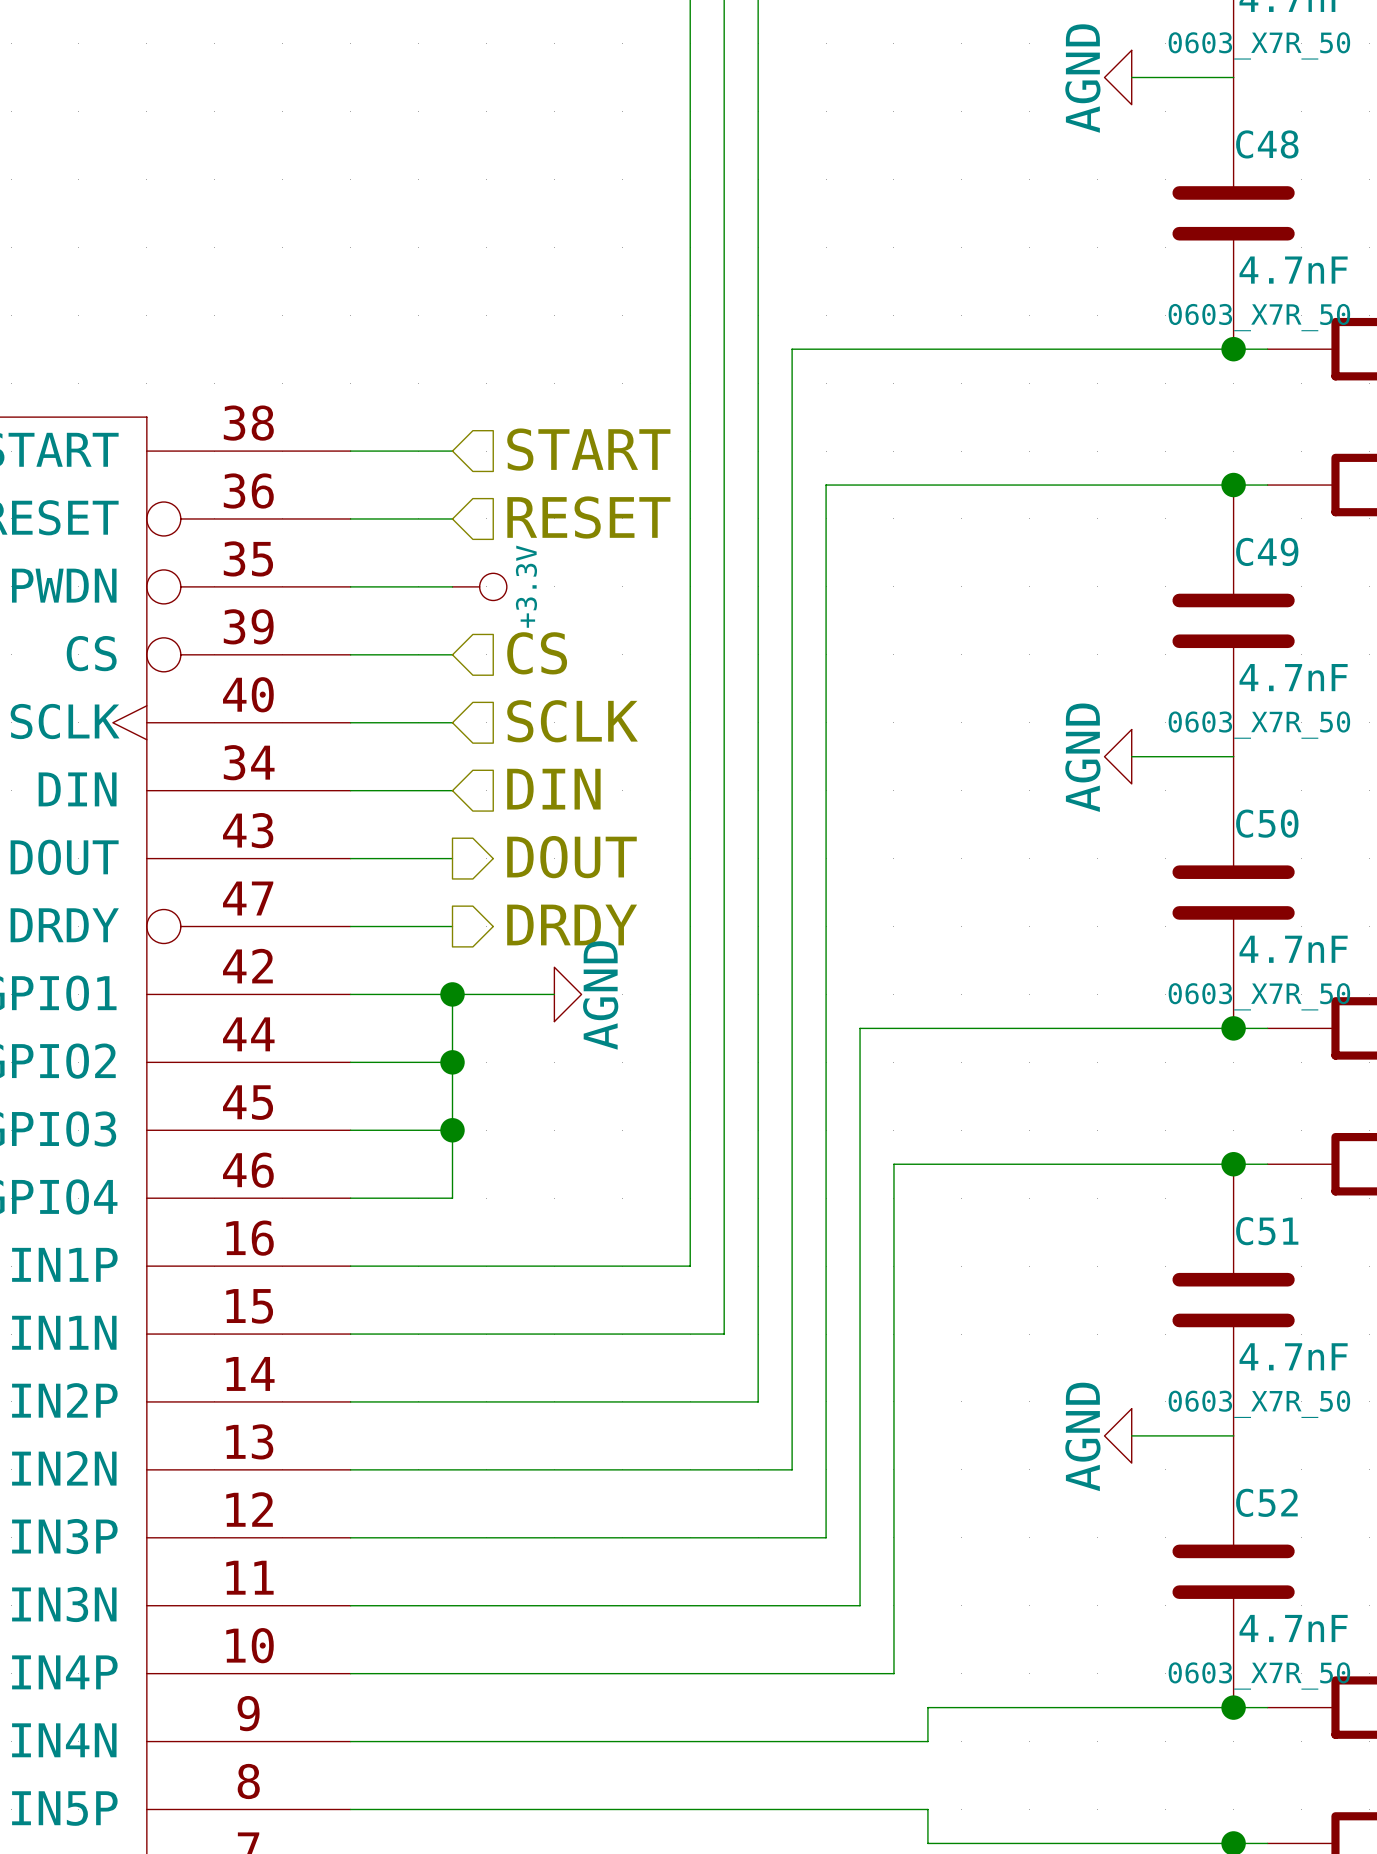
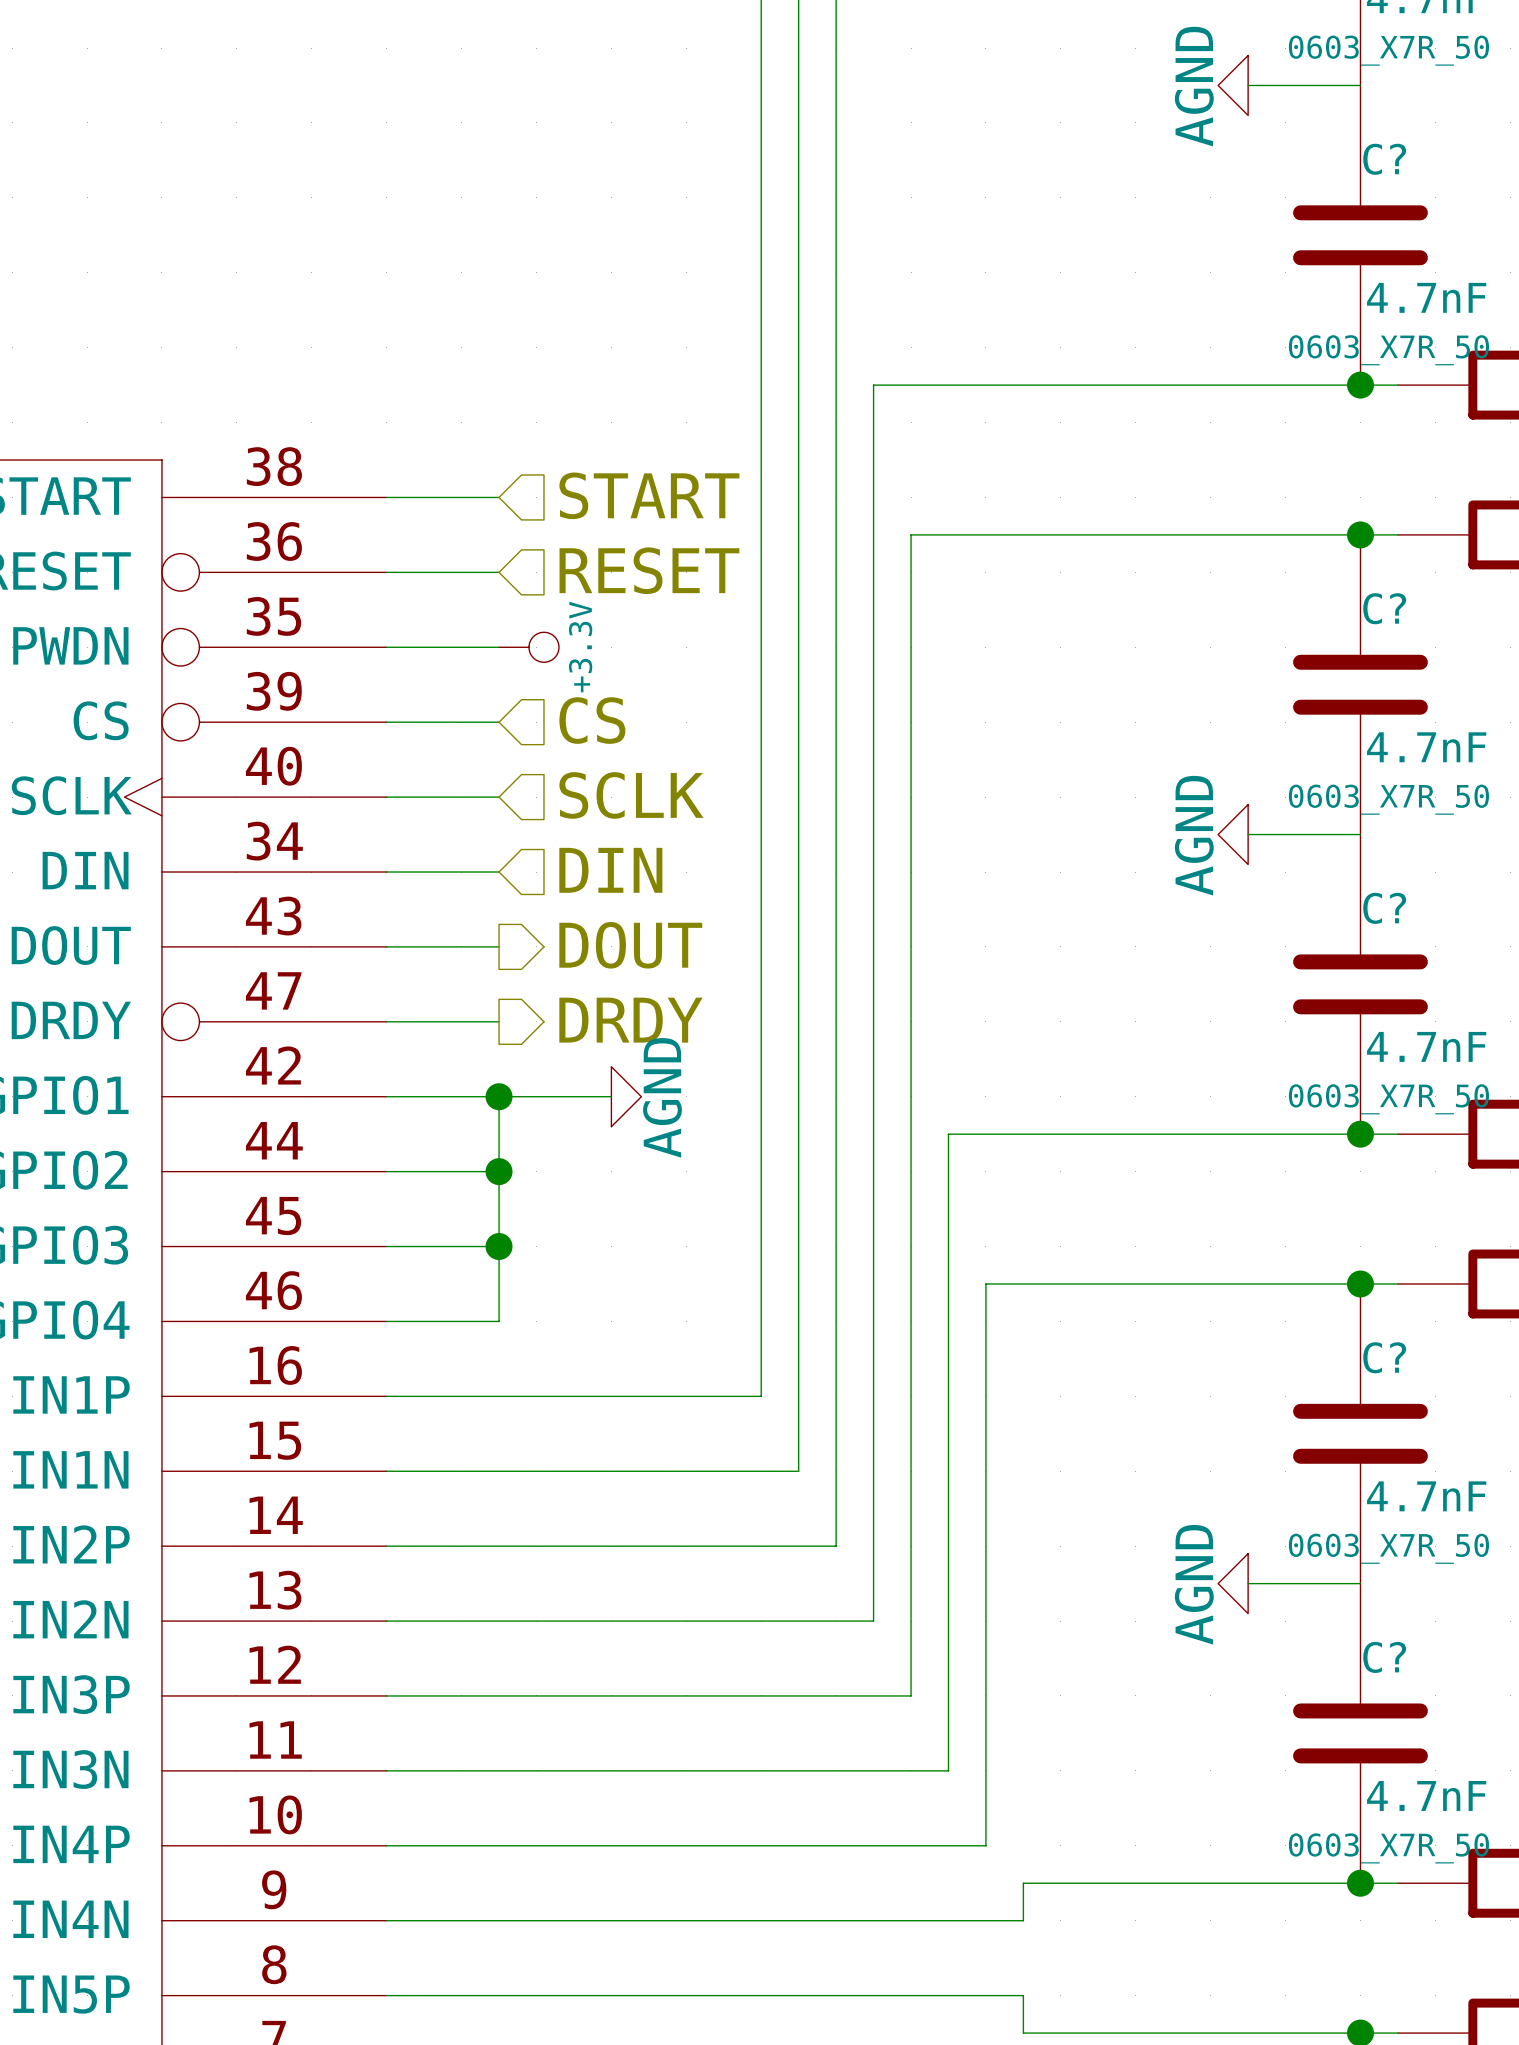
C48 name: C48 (1267, 144) -> C? (1384, 159)
C49 name: C49 (1267, 551) -> C? (1384, 608)
C50 name: C50 (1267, 823) -> C? (1384, 908)
C51 name: C51 (1267, 1231) -> C? (1384, 1357)
C52 name: C52 (1266, 1502) -> C? (1384, 1657)

